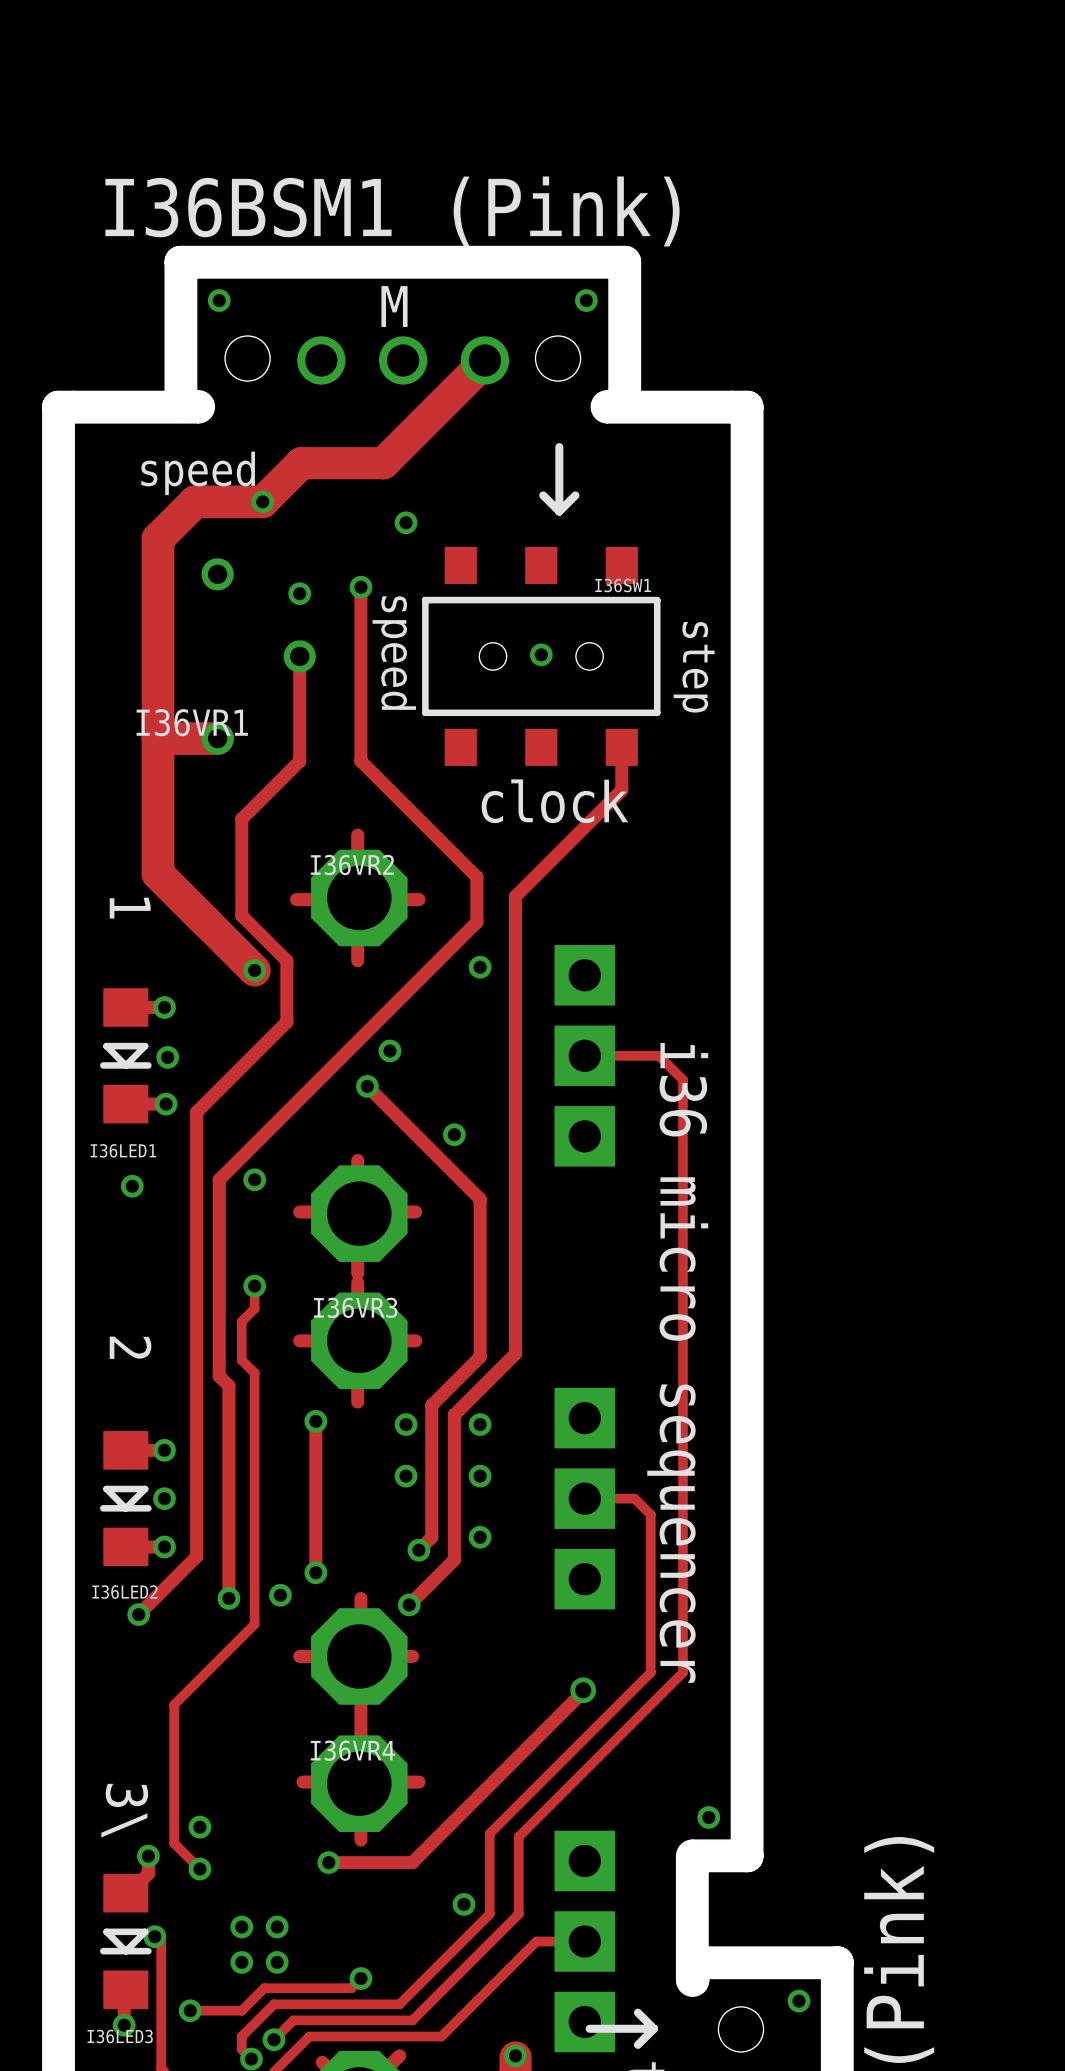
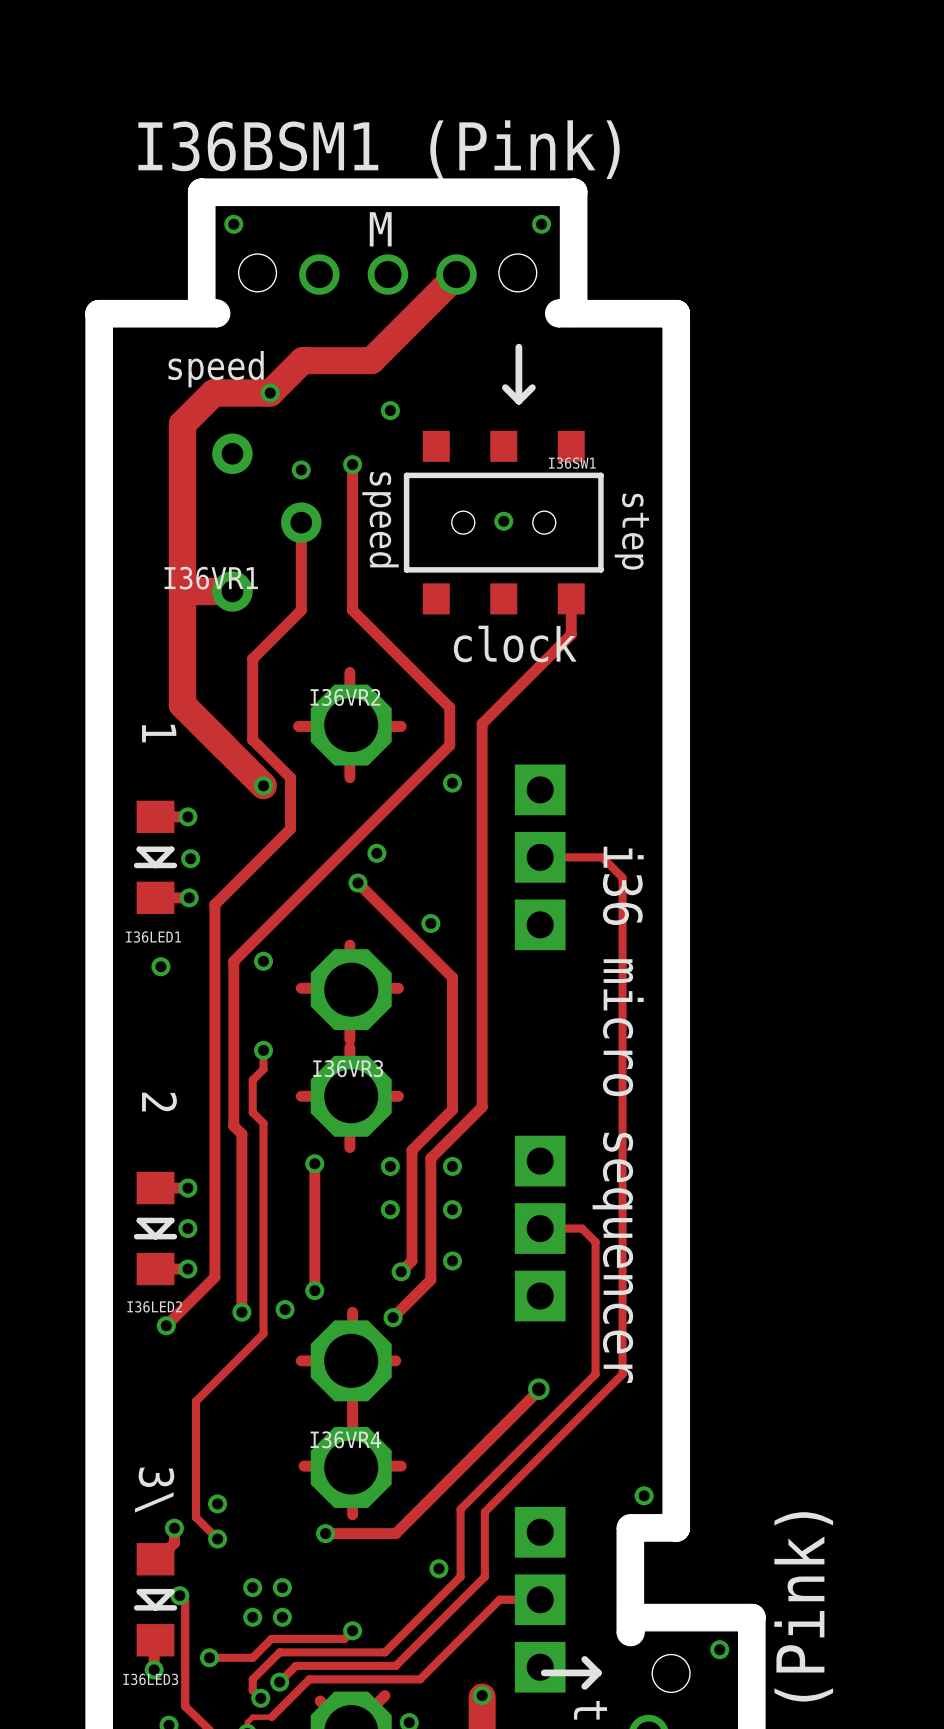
I36VR1 footprint: [201, 558, 316, 755] -> [212, 433, 322, 612]

